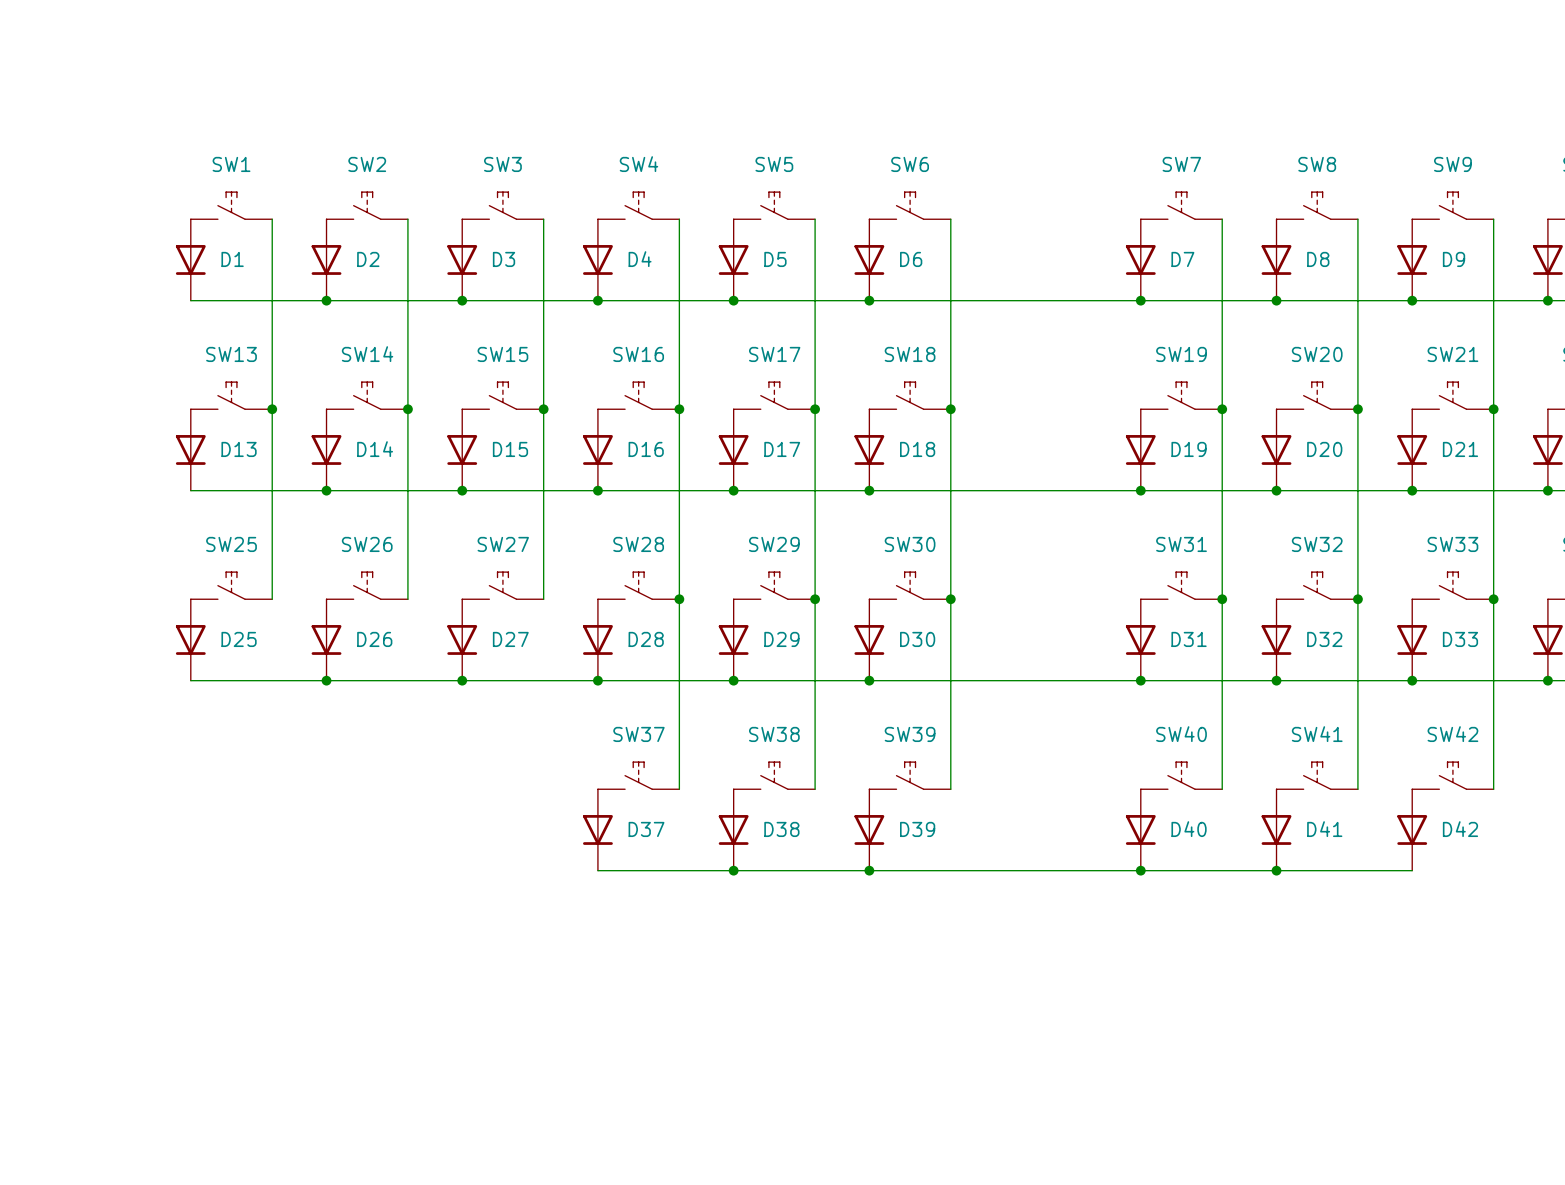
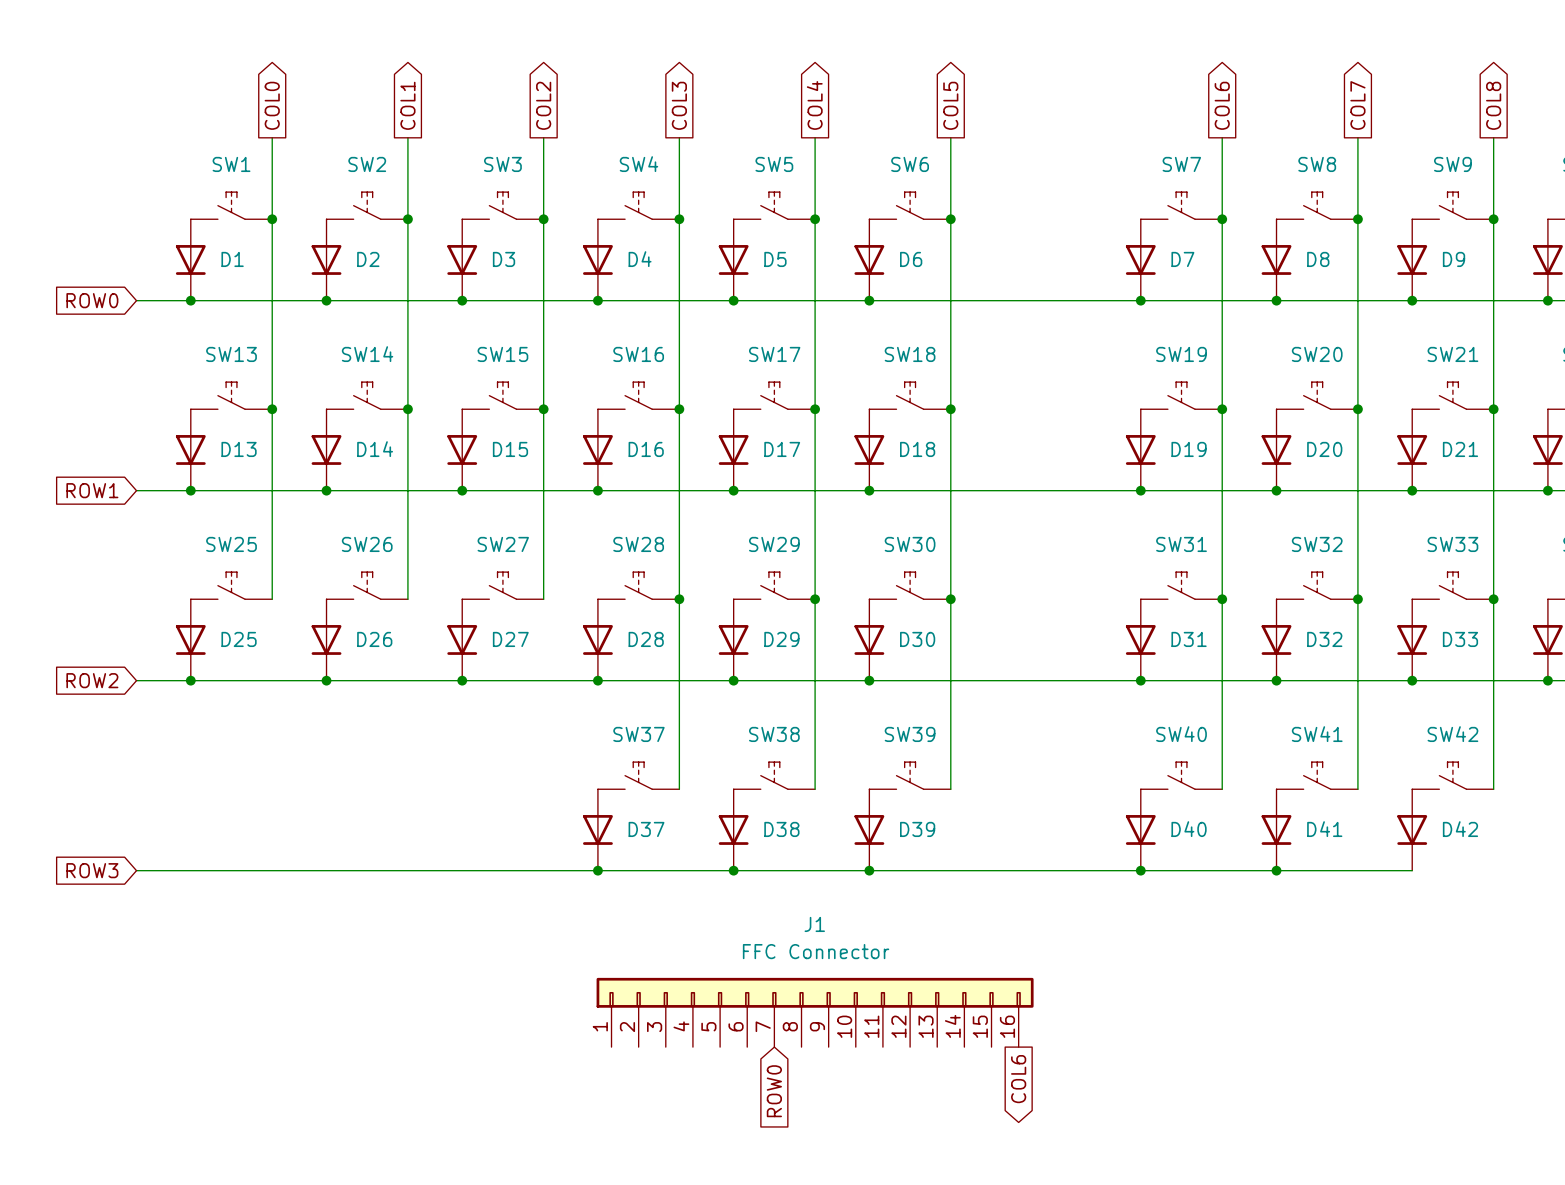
global label: none -> COL0 (272, 105)
global label: none -> COL1 (407, 105)
global label: none -> COL2 (543, 105)
global label: none -> COL3 (679, 105)
global label: none -> COL4 (814, 105)
global label: none -> COL5 (950, 105)
global label: none -> COL6 (1222, 105)
global label: none -> COL7 (1357, 105)
global label: none -> COL8 (1493, 105)
wire: none -> (272, 137) (272, 219)
wire: none -> (407, 137) (407, 219)
wire: none -> (543, 137) (543, 219)
wire: none -> (679, 137) (679, 219)
wire: none -> (815, 137) (815, 219)
wire: none -> (950, 137) (950, 219)
wire: none -> (1222, 137) (1222, 219)
wire: none -> (1357, 137) (1357, 219)
wire: none -> (1493, 137) (1493, 219)
junction: none -> (272, 219)
junction: none -> (407, 219)
junction: none -> (543, 219)
junction: none -> (679, 219)
junction: none -> (815, 219)
junction: none -> (950, 219)
junction: none -> (1222, 219)
junction: none -> (1357, 219)
junction: none -> (1493, 219)
global label: none -> ROW0 (92, 300)
wire: none -> (136, 300) (190, 300)
junction: none -> (190, 300)
global label: none -> ROW1 (92, 490)
wire: none -> (136, 490) (190, 490)
junction: none -> (190, 490)
global label: none -> ROW2 (92, 680)
wire: none -> (136, 680) (190, 680)
junction: none -> (190, 680)
global label: none -> ROW3 (92, 870)
wire: none -> (136, 870) (597, 870)
junction: none -> (597, 870)
J1: none -> FFC Connector (815, 1012)
global label: none -> COL6 (1018, 1079)
global label: none -> ROW0 (774, 1091)

